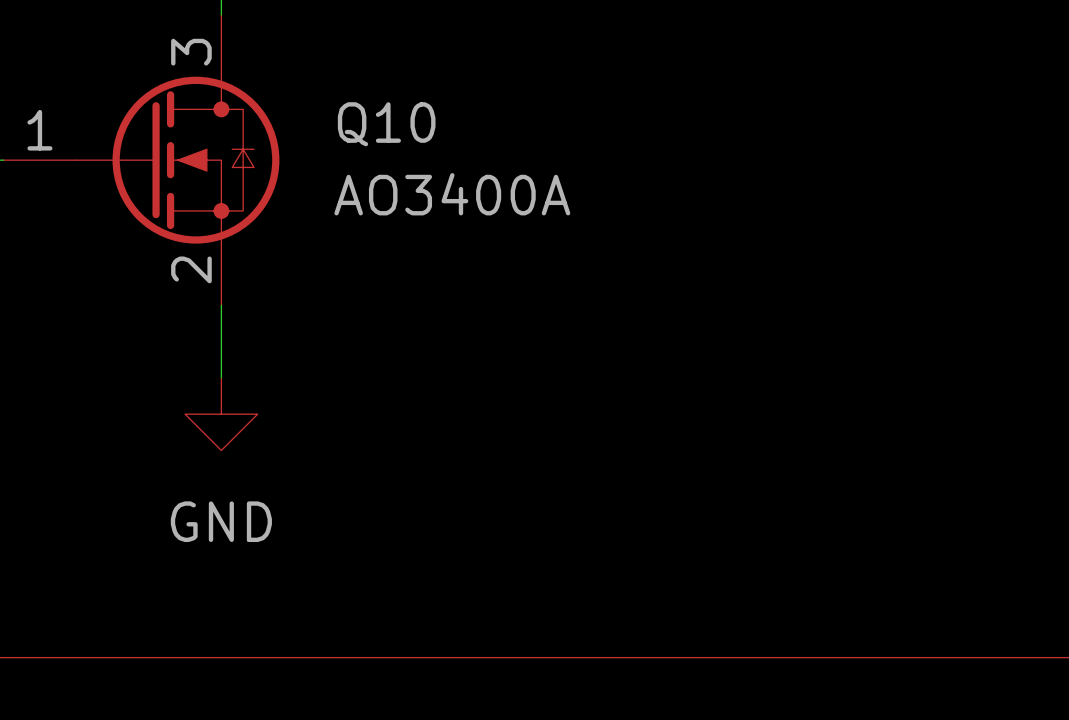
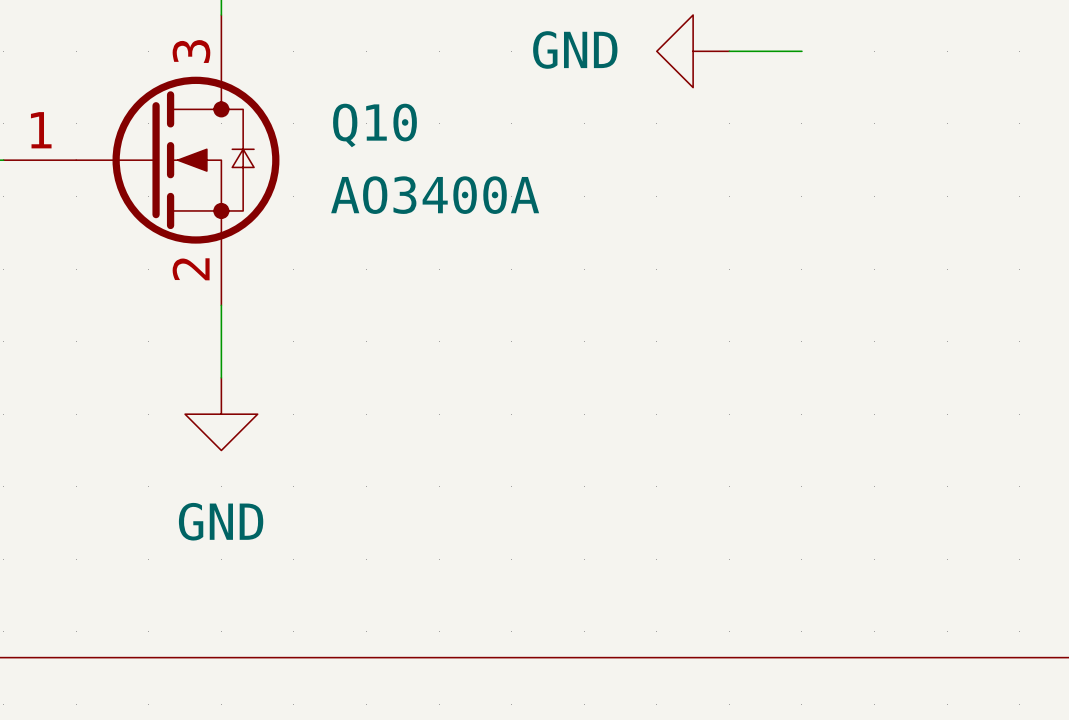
power symbol: none -> GND (693, 51)
wire: none -> (729, 51) (801, 51)

